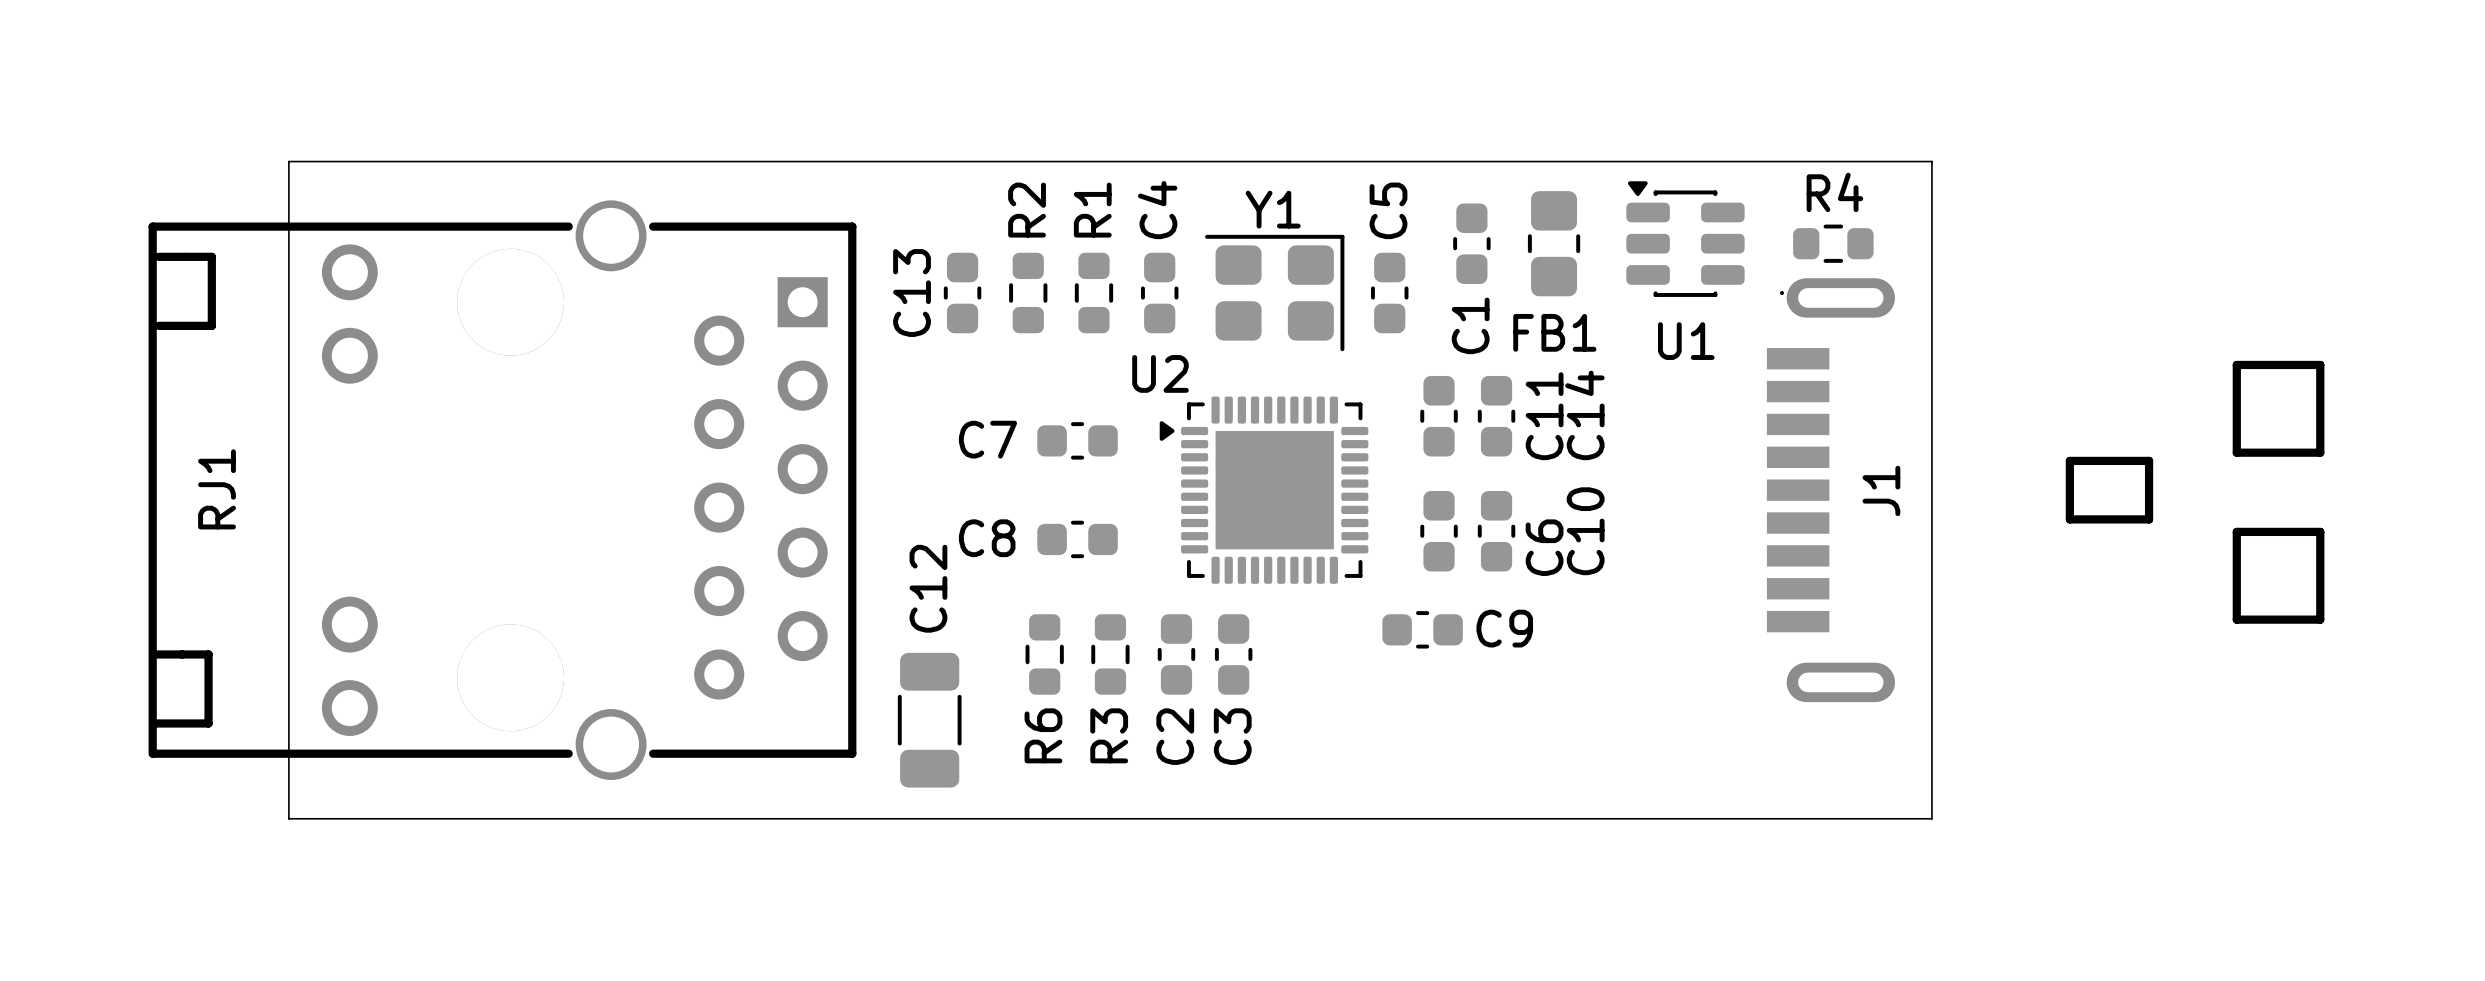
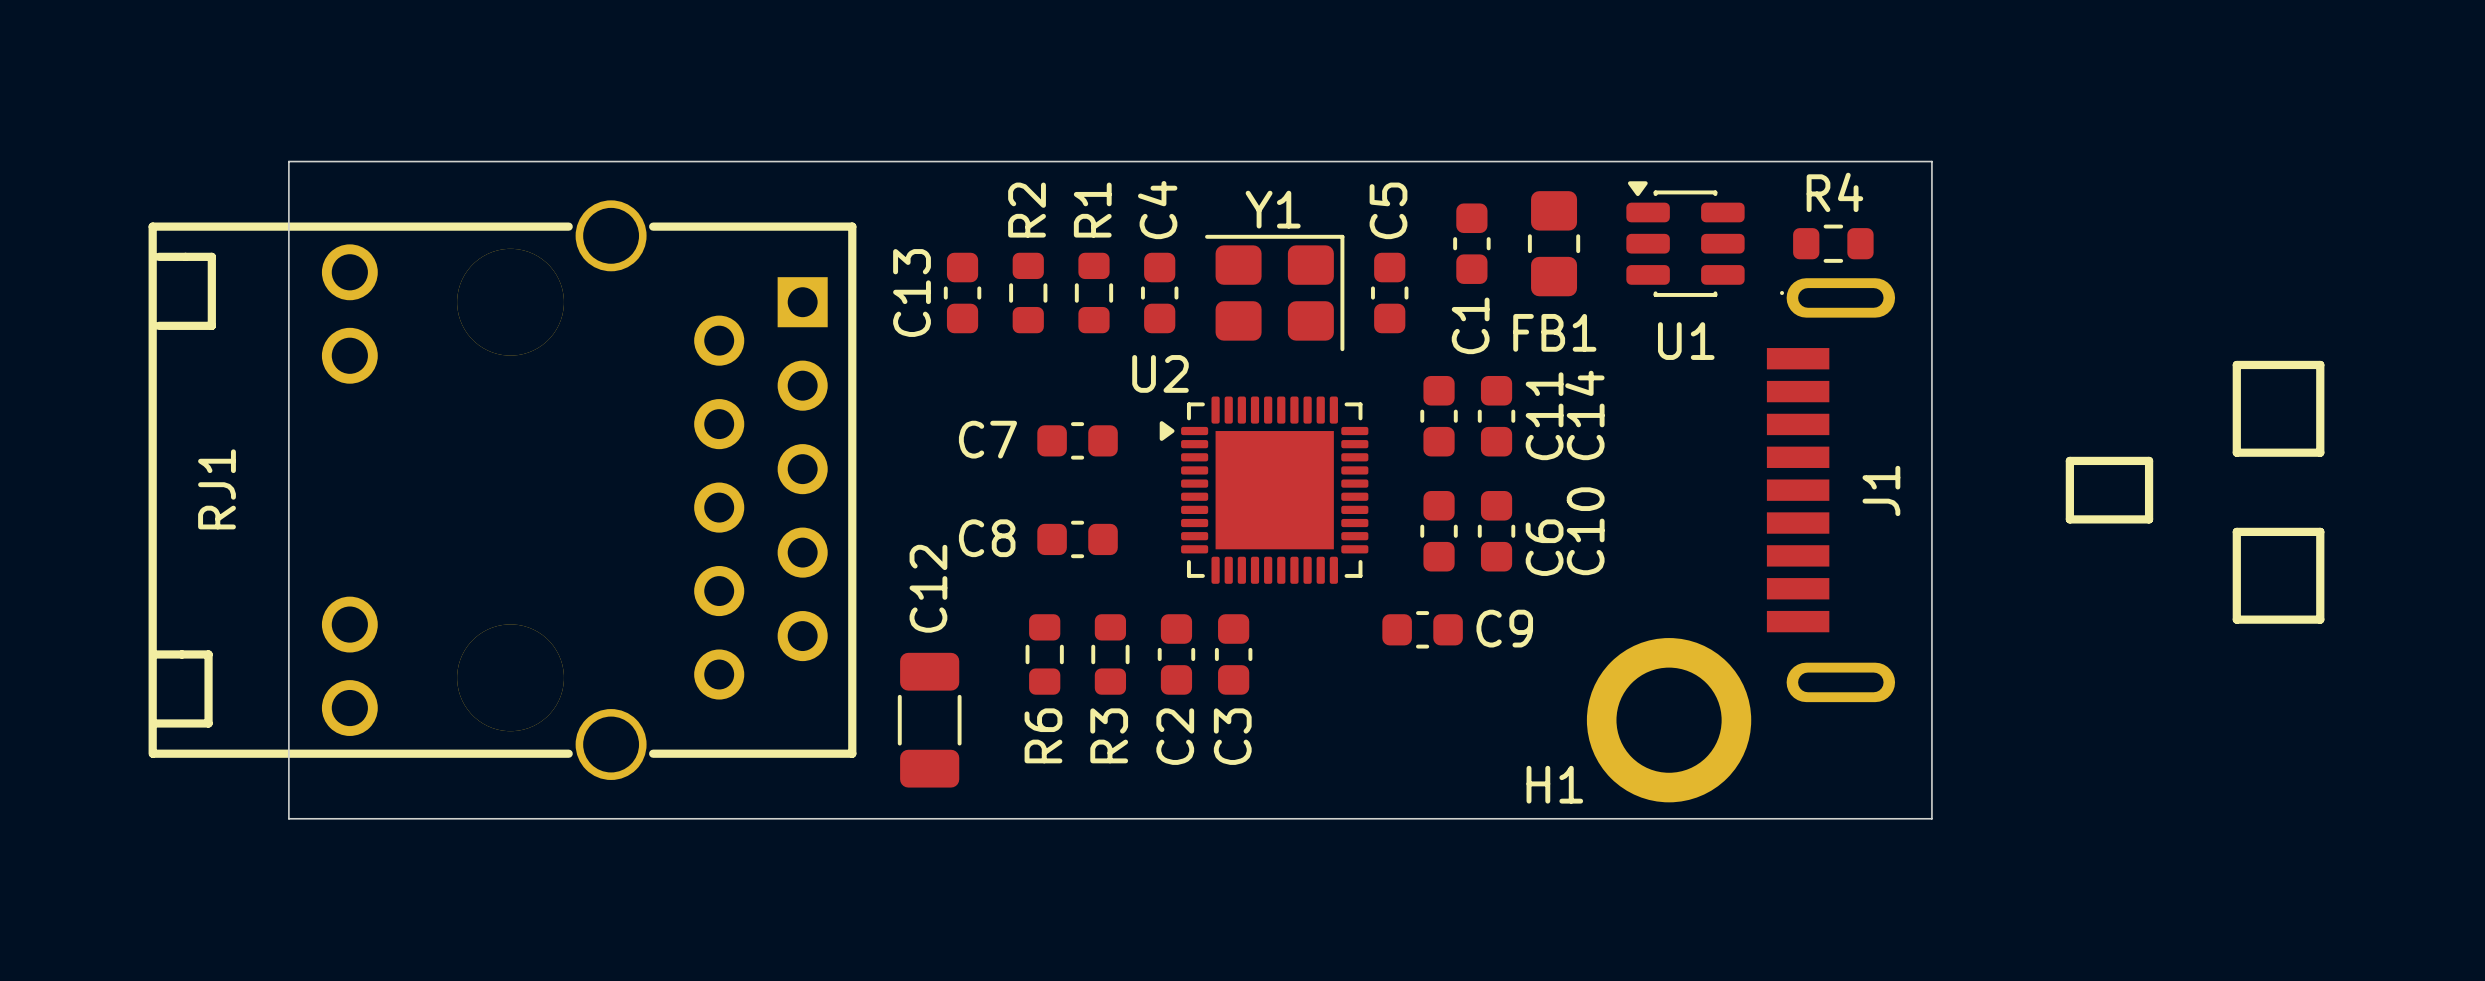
H1: none -> (1669, 720)

